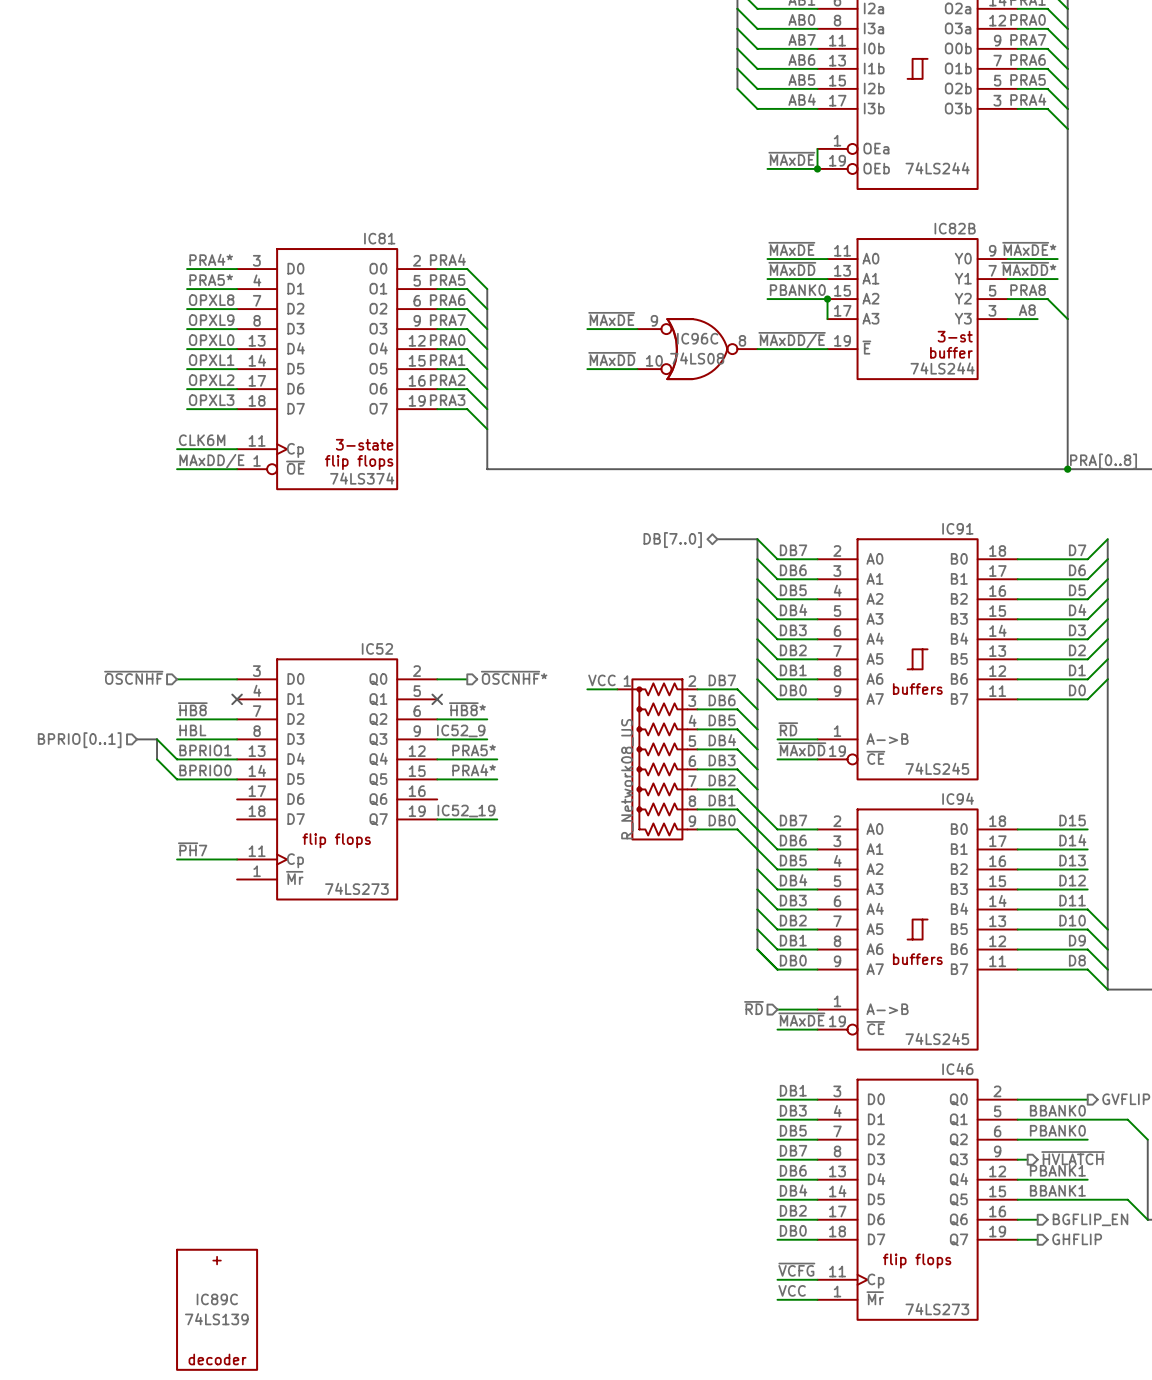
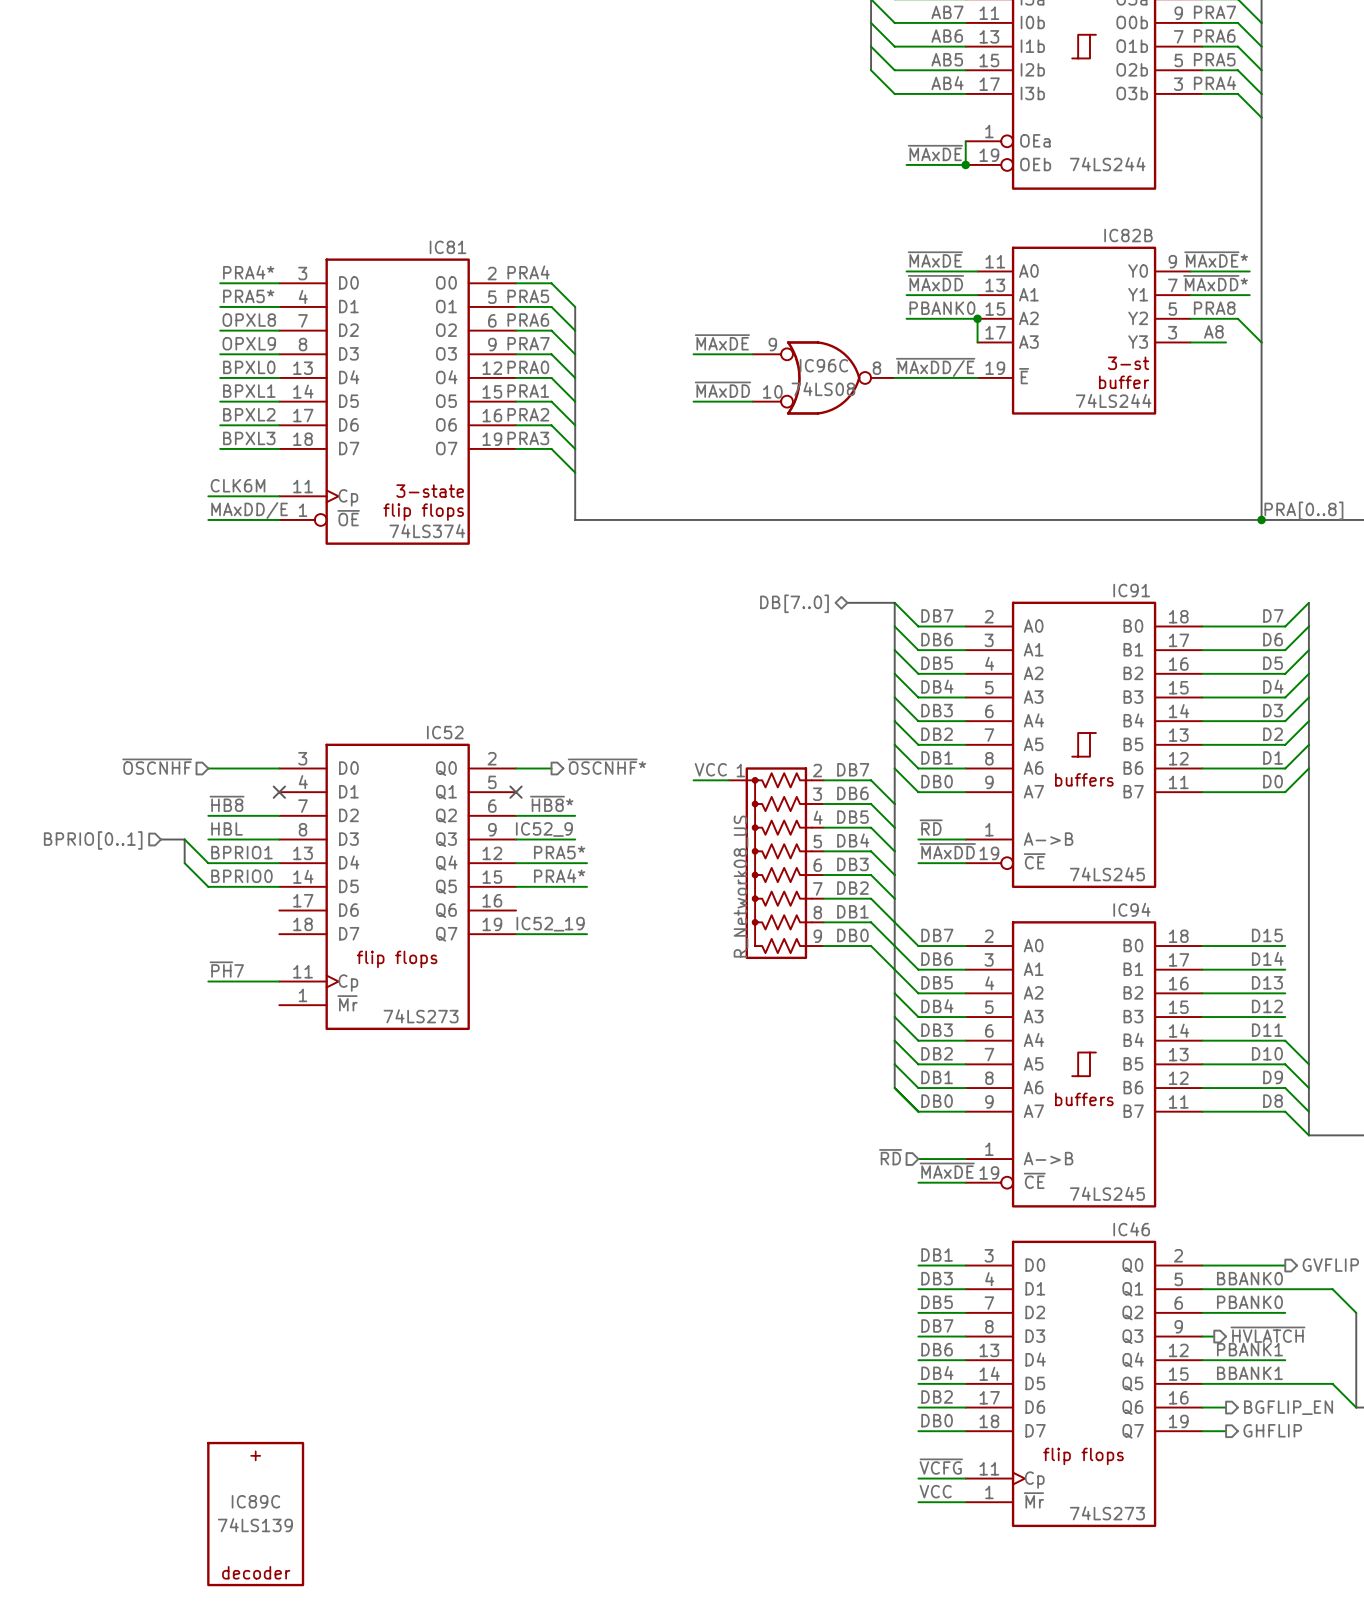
label: OPXL0 (211, 340) -> BPXL0 (249, 367)
label: OPXL1 (211, 360) -> BPXL1 (249, 391)
label: OPXL2 (211, 380) -> BPXL2 (249, 414)
label: OPXL3 (211, 400) -> BPXL3 (249, 438)

